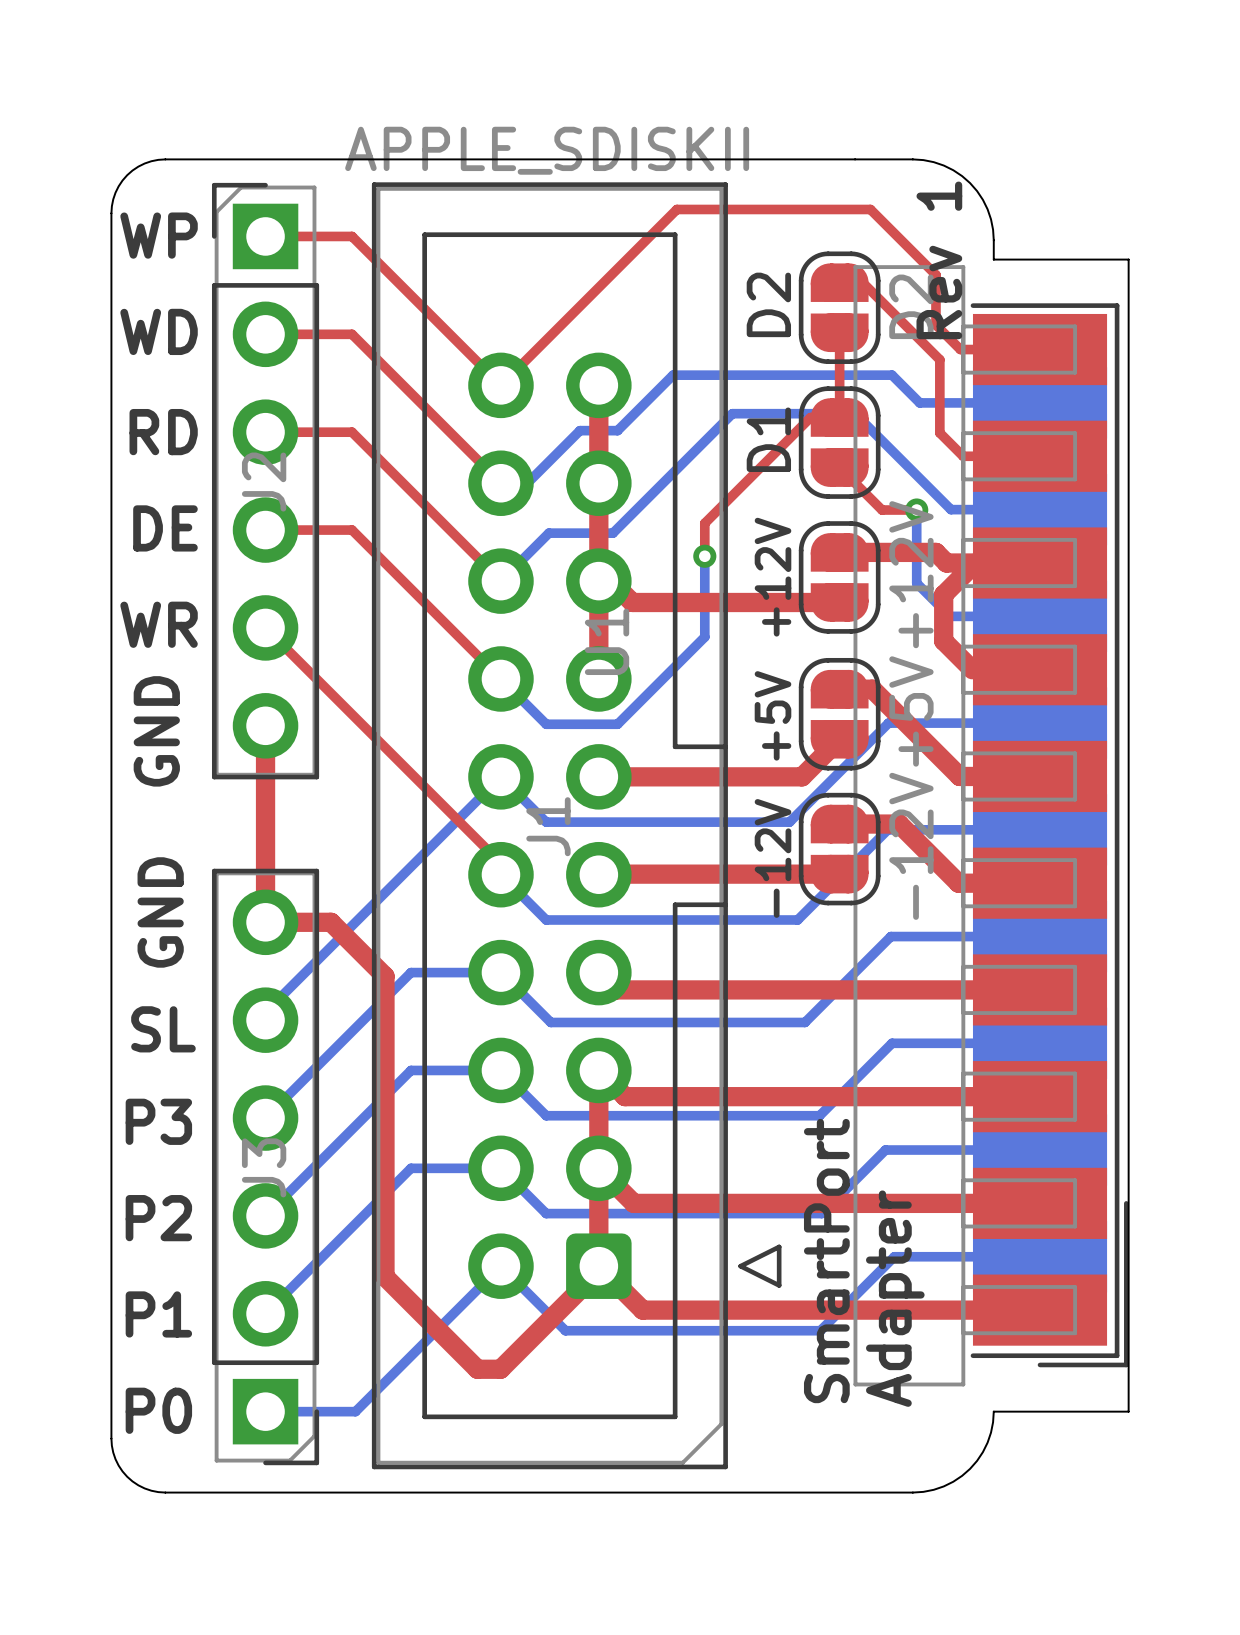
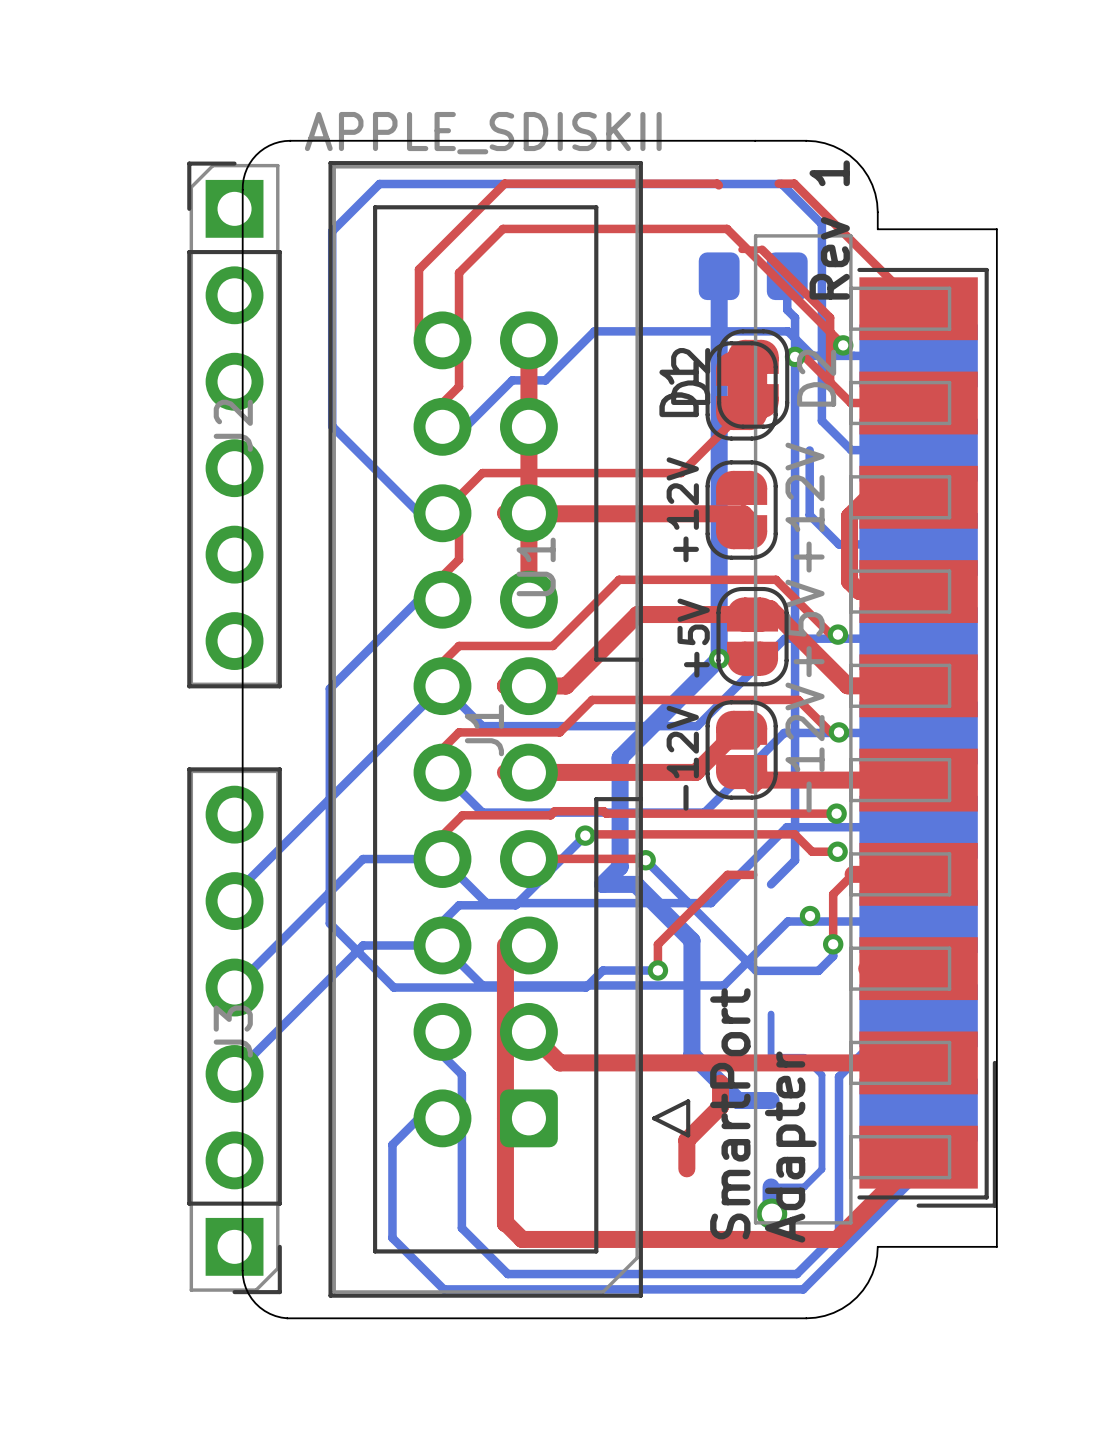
board edge: (328, 159) (165, 159) (151, 161) (138, 166) (122, 180) (115, 192) (111, 213) (111, 1445) (115, 1459) (122, 1471) (138, 1485) (151, 1490) (165, 1492) (325, 1492) -> (290, 140) (274, 143) (256, 155) (245, 173) (242, 189) (242, 1270) (245, 1288) (255, 1303) (269, 1313) (287, 1318)
top track: none -> (778, 183) (794, 183) (918, 308)
top track: none -> (718, 185) (717, 183) (504, 183) (419, 269) (419, 340)
text: WP (159, 235) -> none
top track: (265, 236) (352, 236) (500, 385) (676, 209) (870, 209) (935, 274) (935, 325) (960, 349) (1040, 349) (1030, 340) -> none
D2 position: (839, 307) -> (753, 379)
bottom track: none -> (719, 276) (719, 658) (620, 757) (620, 866) (602, 884) (635, 884) (691, 940) (691, 1054) (737, 1100) (771, 1100)
part: none -> (753, 276)
bottom track: none -> (787, 276) (787, 309) (795, 317) (795, 860) (771, 884)
text: WD (159, 331) -> none
top track: (839, 332) (839, 417) (810, 417) (704, 523) (704, 556) -> none
top track: (265, 334) (352, 334) (500, 483) -> none
top track: none -> (843, 345) (727, 228) (503, 228) (459, 272) (459, 386) (419, 426)
via: none -> (843, 345)
via: none -> (795, 356)
text: RD (163, 432) -> none
top track: (265, 432) (352, 432) (500, 581) -> none
top track: none -> (753, 401) (681, 473) (482, 473) (459, 496) (459, 559) (419, 599)
top track: (839, 467) (882, 510) (916, 510) -> none
bottom track: (963, 509) (951, 509) (855, 413) (732, 413) (612, 533) (548, 533) (500, 581) -> (851, 450) (821, 420) (821, 224) (781, 184) (379, 184) (332, 231) (332, 426) (419, 513)
via: (916, 510) -> none
text: DE (165, 528) -> none
top track: (265, 530) (352, 530) (500, 678) -> none
top track: (839, 552) (935, 552) (946, 563) (983, 563) -> none
bottom track: (704, 556) (704, 637) (617, 724) (546, 724) (500, 678) -> none
via: (704, 556) -> none
top track: (1040, 563) (975, 563) (943, 594) (943, 641) (972, 669) -> (868, 497) (849, 516) (849, 581) (859, 591)
top track: (598, 568) (632, 602) (839, 602) -> none
top track: none -> (505, 513) (743, 513) (752, 522)
text: WR (159, 624) -> none
top track: (265, 627) (500, 863) (500, 874) -> none
bottom track: none -> (419, 599) (329, 688) (329, 923) (393, 987) (585, 987) (602, 970) (657, 970)
top track: none -> (752, 614) (637, 614) (566, 685) (505, 685) (517, 674)
+5V position: (839, 714) -> (752, 636)
top track: none -> (837, 634) (830, 634) (776, 579) (619, 579) (552, 645) (459, 645) (419, 685)
via: none -> (837, 634)
top track: (265, 725) (265, 922) (331, 922) (384, 976) (384, 1276) (477, 1369) (500, 1369) (598, 1271) -> none
text: GND (156, 731) -> none
top track: (839, 739) (802, 776) (598, 776) -> none
via: none -> (719, 658)
top track: (839, 824) (899, 824) (958, 883) -> (752, 785) (758, 780) (846, 780)
top track: none -> (838, 732) (830, 732) (798, 699) (592, 699) (559, 732) (459, 732) (419, 772)
via: none -> (838, 732)
top track: none -> (752, 741) (727, 741) (695, 772) (505, 772)
top track: (598, 862) (610, 874) (839, 874) -> none
text: GND (160, 912) -> none
top track: none -> (836, 813) (606, 813) (603, 811) (554, 811) (550, 815) (462, 815) (419, 858)
via: none -> (836, 813)
top track: none -> (585, 835) (794, 834) (812, 851) (837, 851)
bottom track: none -> (585, 835) (515, 905) (459, 905) (419, 945)
via: none -> (585, 835)
via: none -> (837, 851)
top track: none -> (505, 858) (644, 858)
top track: (598, 972) (616, 989) (965, 989) -> (833, 944) (833, 894) (853, 874)
bottom track: none -> (644, 858) (756, 970) (818, 970) (833, 956) (833, 944)
via: none -> (645, 860)
top track: none -> (753, 874) (727, 874) (657, 944) (657, 970)
text: SL (163, 1029) -> none
via: none -> (810, 916)
via: none -> (833, 944)
top track: none -> (505, 945) (505, 1223) (522, 1239) (836, 1239) (918, 1157)
top track: (981, 1096) (625, 1096) (598, 1070) (598, 1266) -> none
via: none -> (657, 970)
text: P3 (158, 1121) -> none
bottom track: none -> (771, 1014) (771, 1057) (804, 1057) (821, 1074) (821, 1169) (804, 1186) (771, 1186) (771, 1213)
bottom track: (989, 1150) (885, 1150) (821, 1213) (546, 1213) (500, 1168) (411, 1168) (265, 1313) -> none
bottom track: none -> (900, 1015) (839, 1076) (839, 1231) (796, 1274) (507, 1274) (461, 1228) (461, 1074) (419, 1031)
text: P2 (158, 1218) -> none
top track: none -> (720, 1083) (720, 1106) (686, 1140) (686, 1168)
bottom track: (1040, 1256) (894, 1256) (820, 1330) (565, 1330) (500, 1266) (355, 1411) (265, 1411) -> (918, 1110) (918, 1174) (803, 1289) (443, 1289) (392, 1238) (392, 1144) (419, 1118)
top track: (598, 1266) (642, 1310) (983, 1310) -> none
text: P1 (158, 1314) -> none
via: none -> (771, 1213)
text: P0 (158, 1410) -> none

